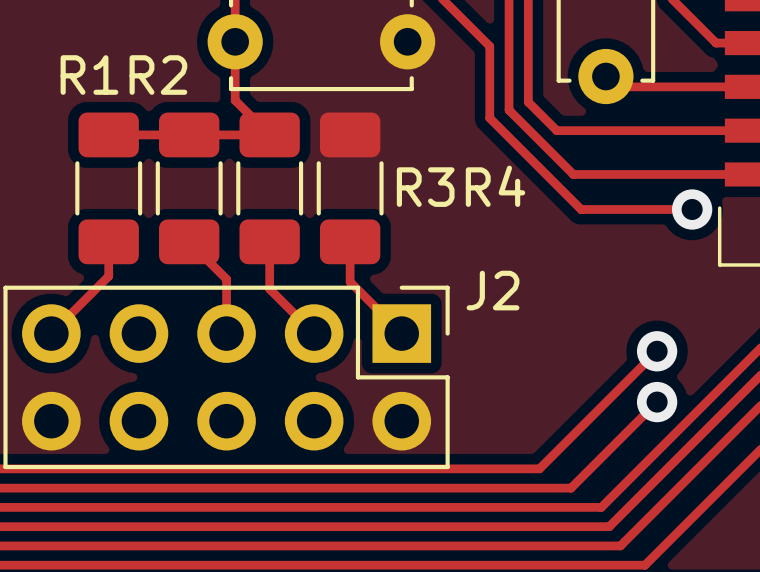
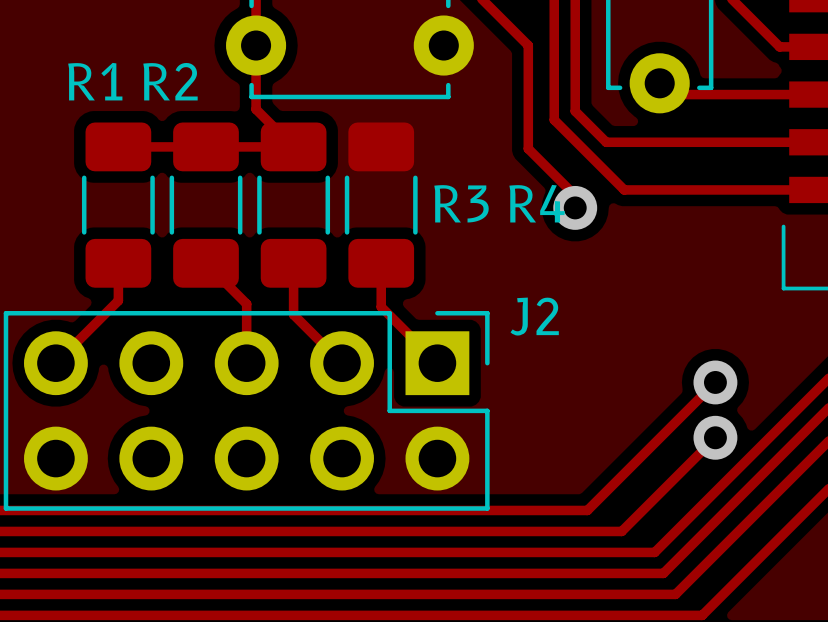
track: (485, 41) (489, 46) (489, 118) (581, 209) (692, 209) -> (528, 45) (528, 148) (575, 195) (575, 207)
via position: (692, 209) -> (575, 207)

